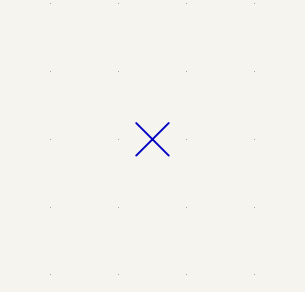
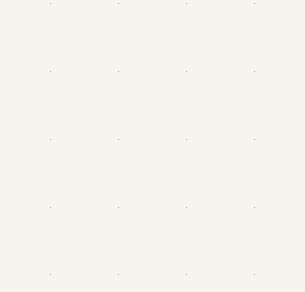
no-connect mark: (152, 139) -> none

